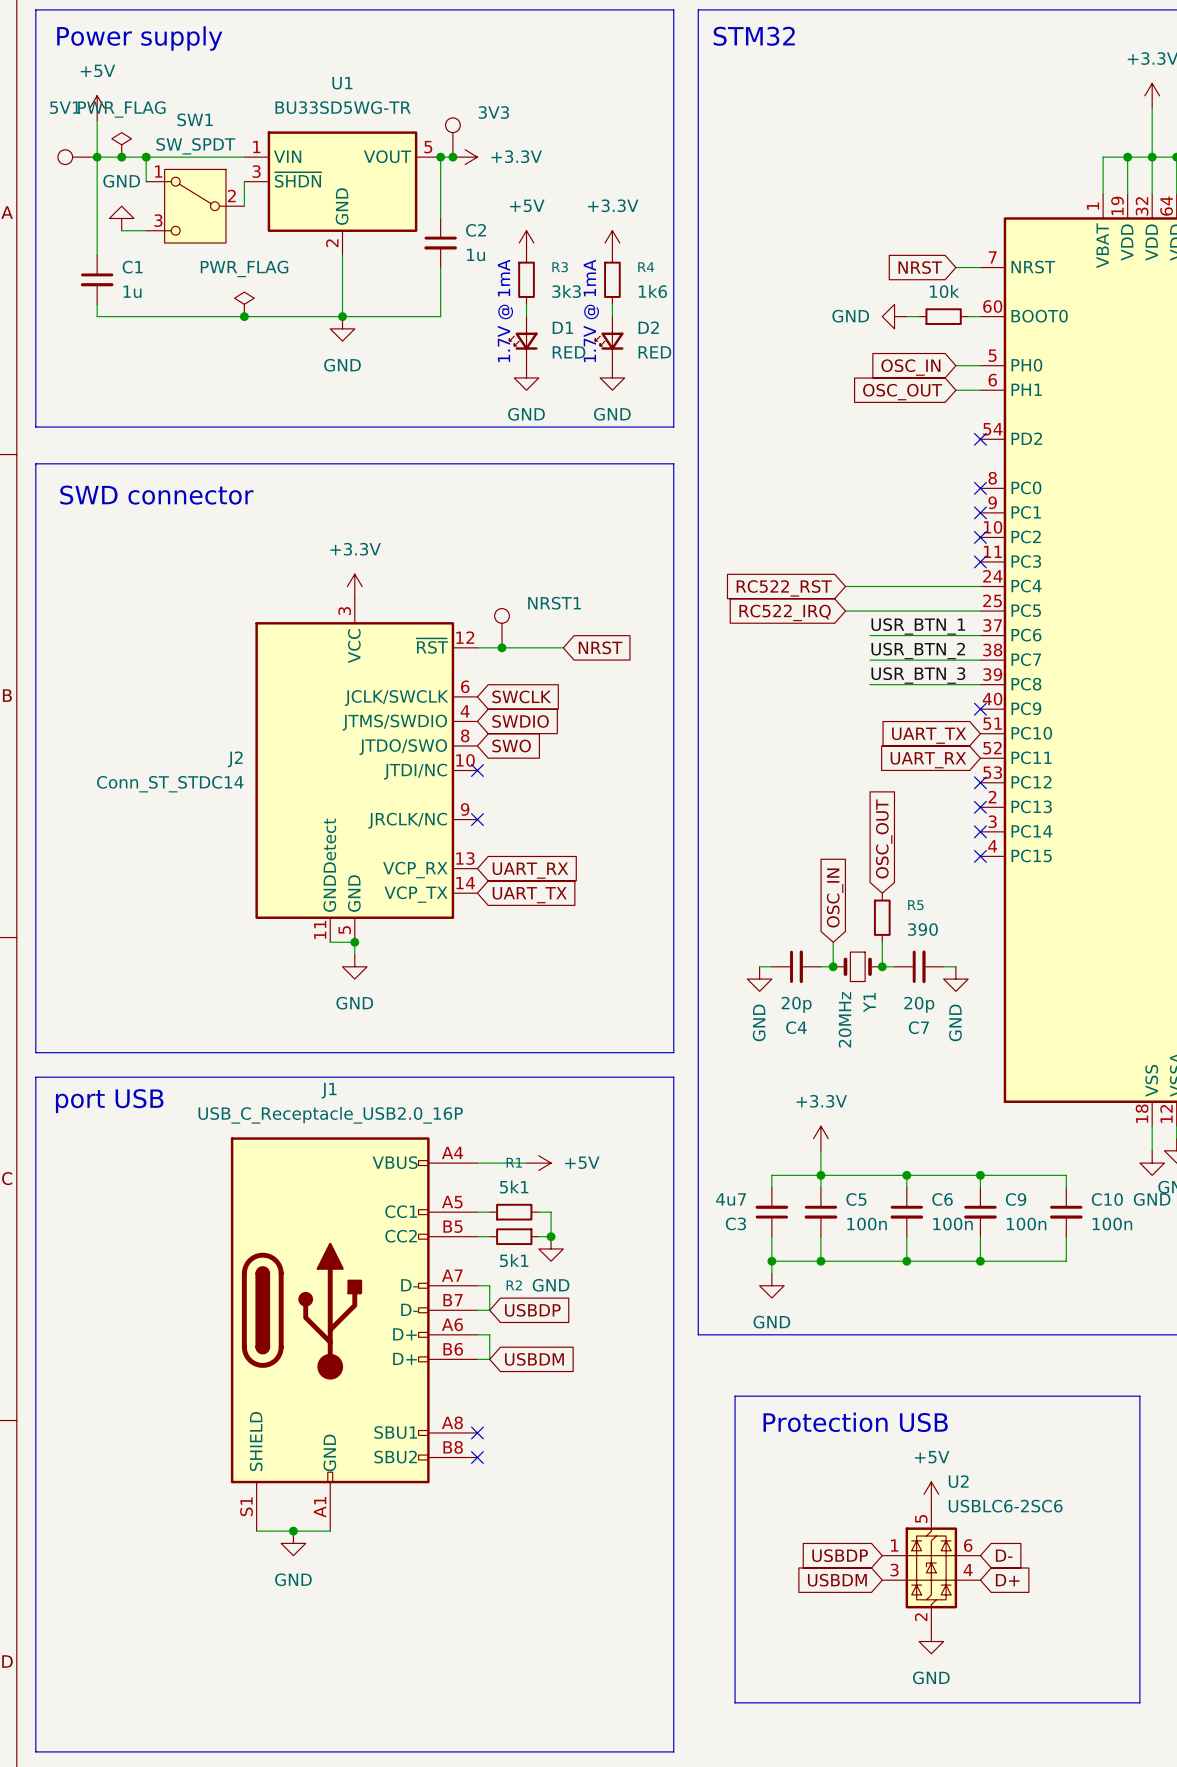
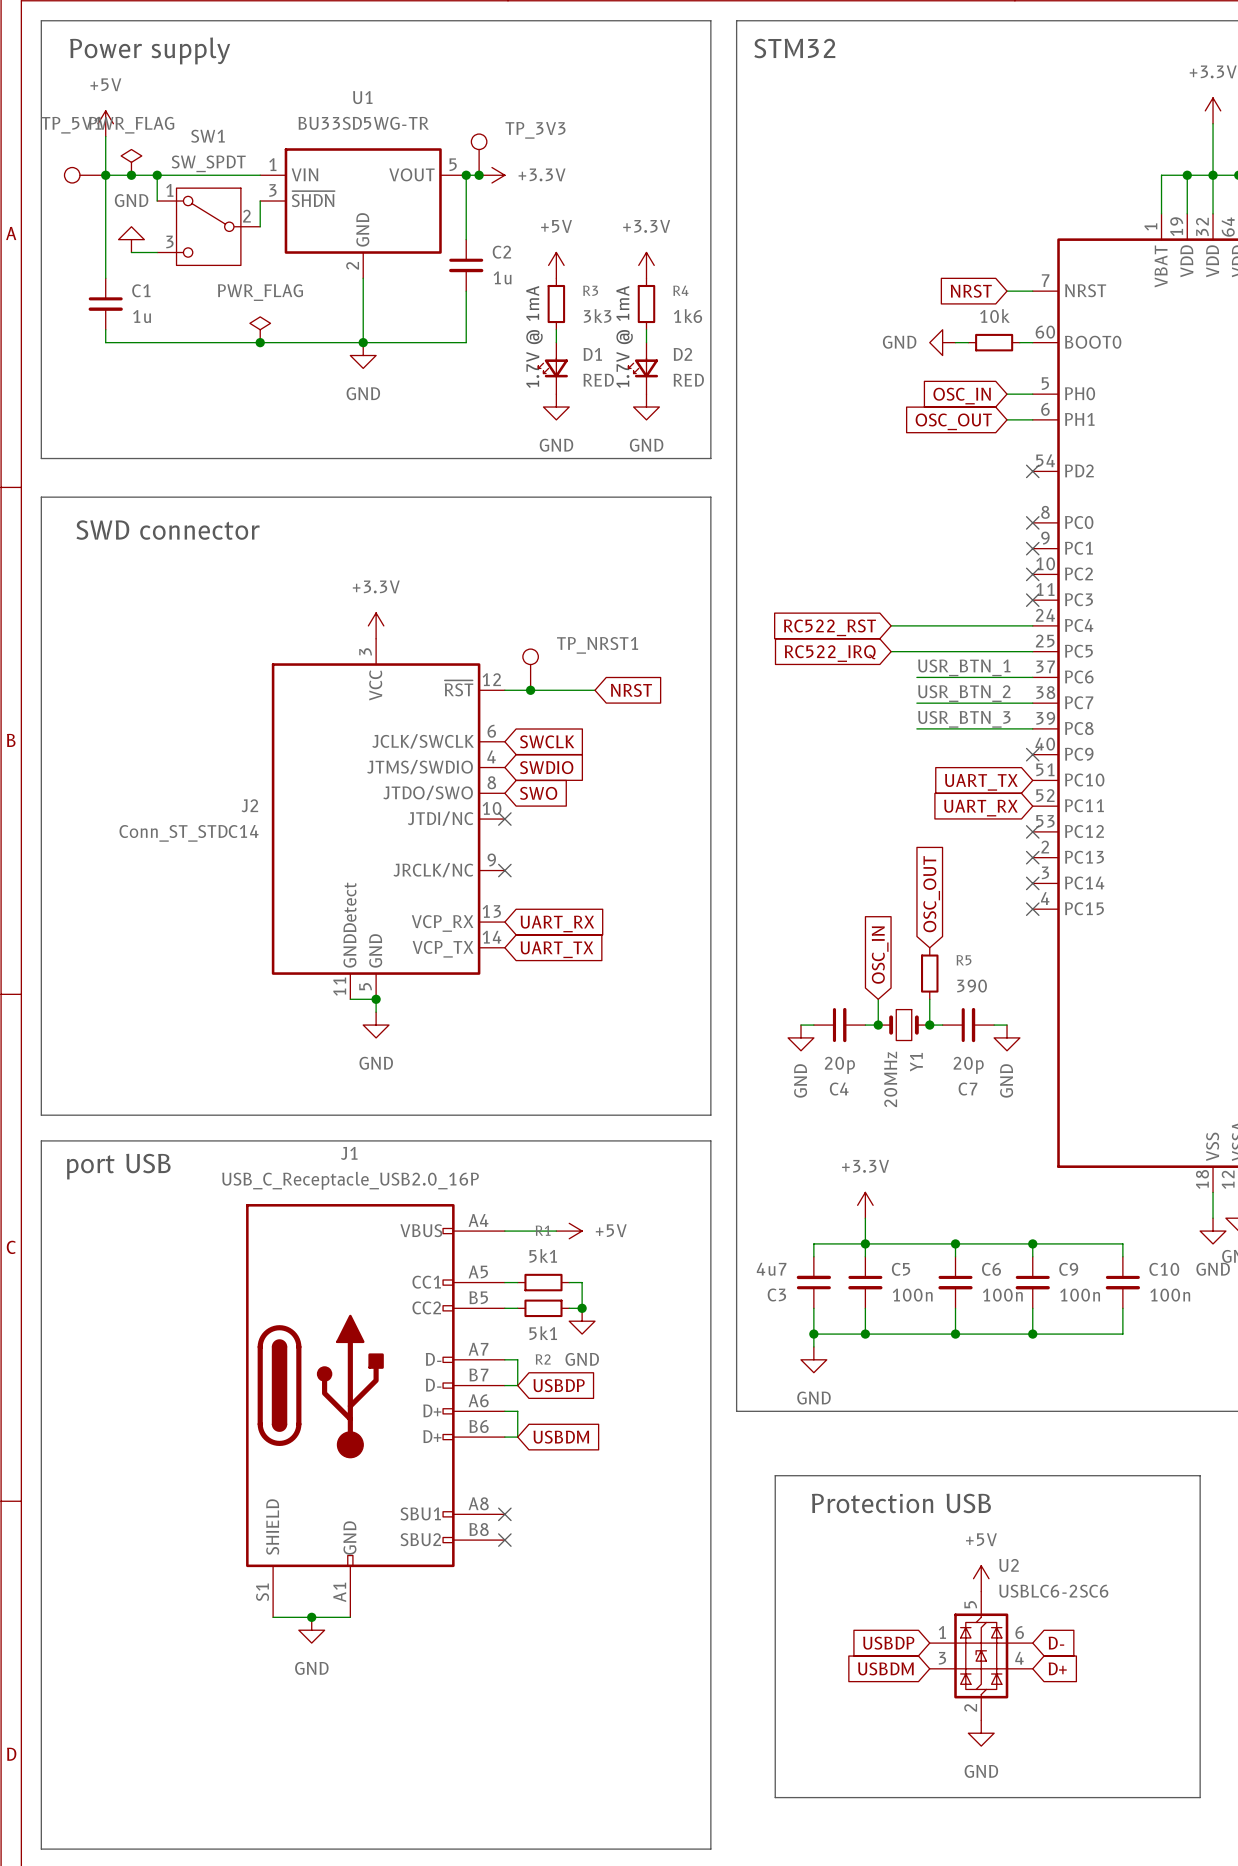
5V1 name: 5V1 (65, 107) -> TP_5V1 (71, 125)
3V3 name: 3V3 (493, 112) -> TP_3V3 (535, 130)
NRST1 name: NRST1 (554, 603) -> TP_NRST1 (597, 645)

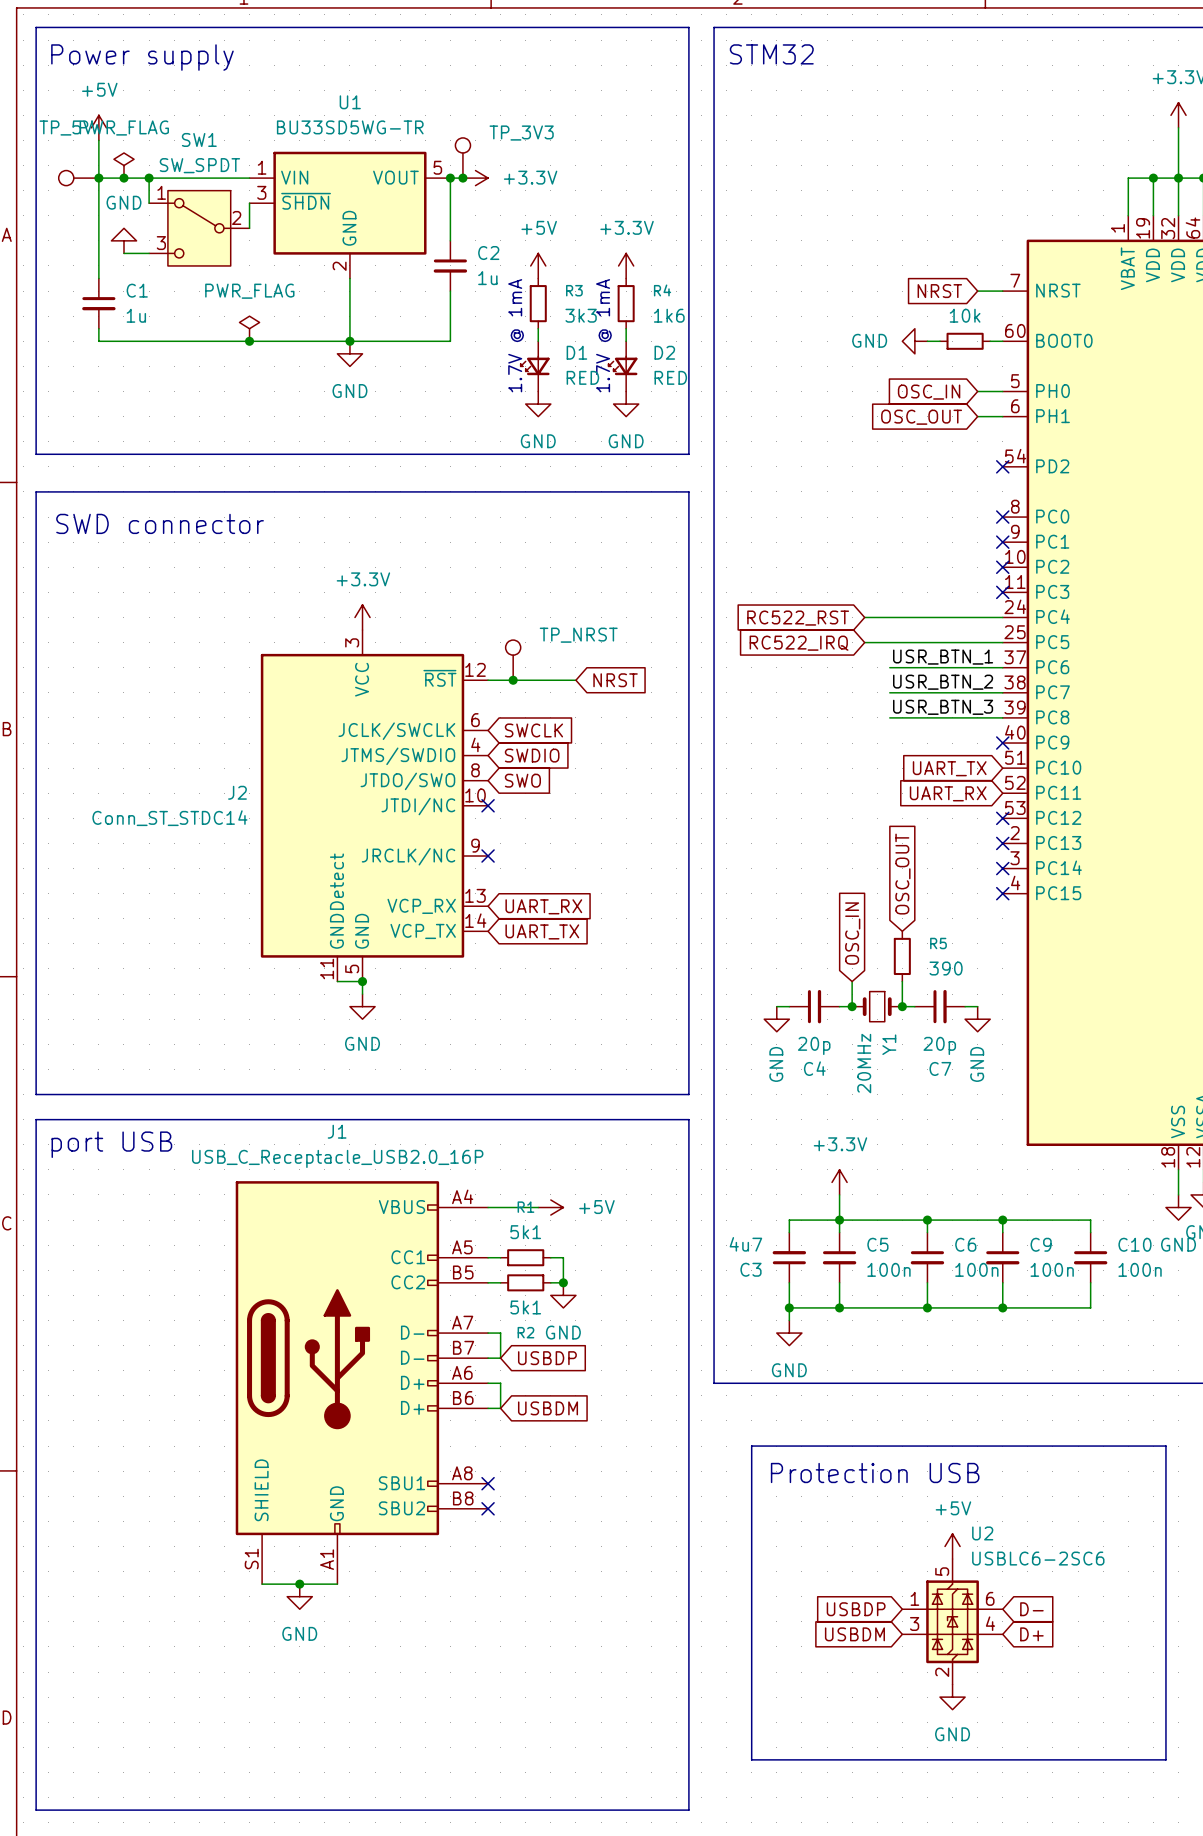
TP_5V1 name: TP_5V1 (71, 125) -> TP_5V (66, 128)
TP_NRST1 name: TP_NRST1 (597, 645) -> TP_NRST (578, 635)

